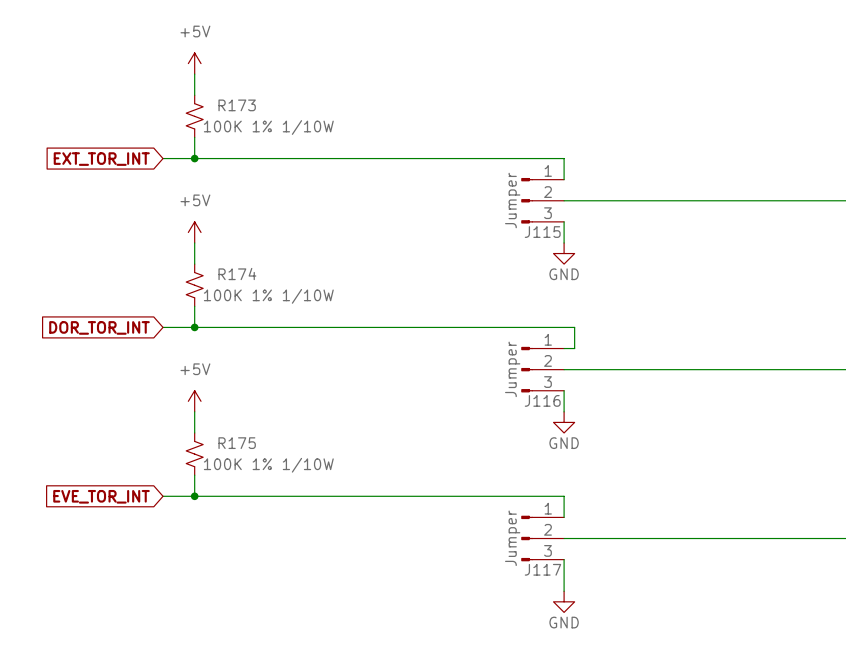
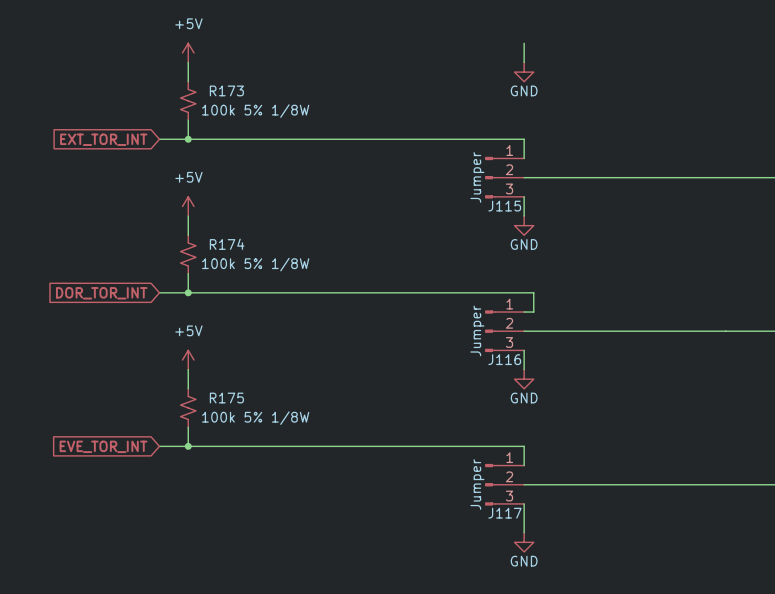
wire: none -> (524, 43) (524, 62)
power symbol: none -> GND (524, 72)
R173 value: 100K 1% 1/10W (268, 127) -> 100k 5% 1/8W (255, 111)
R174 value: 100K 1% 1/10W (268, 296) -> 100k 5% 1/8W (255, 264)
R175 value: 100K 1% 1/10W (268, 465) -> 100k 5% 1/8W (255, 418)

